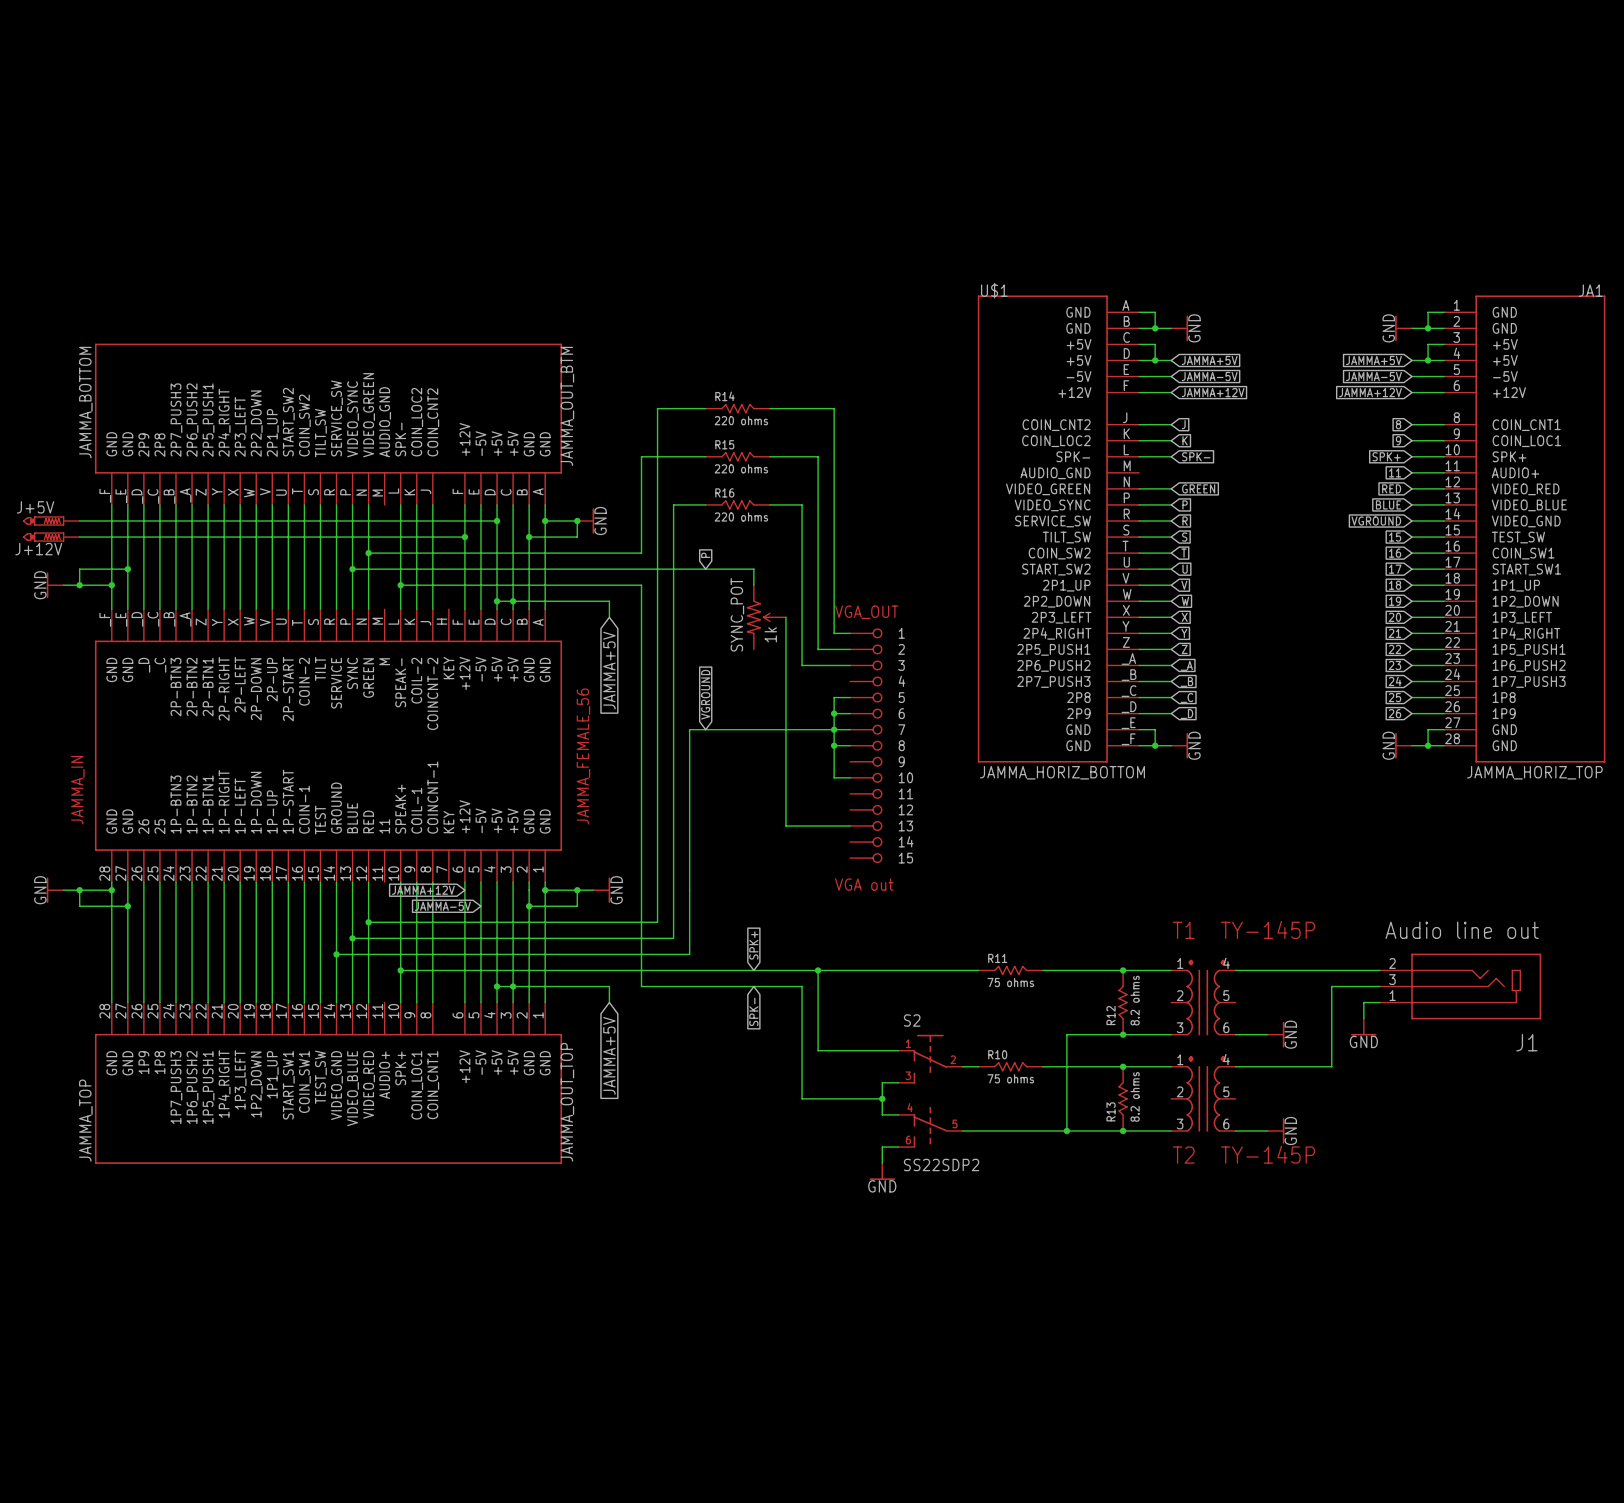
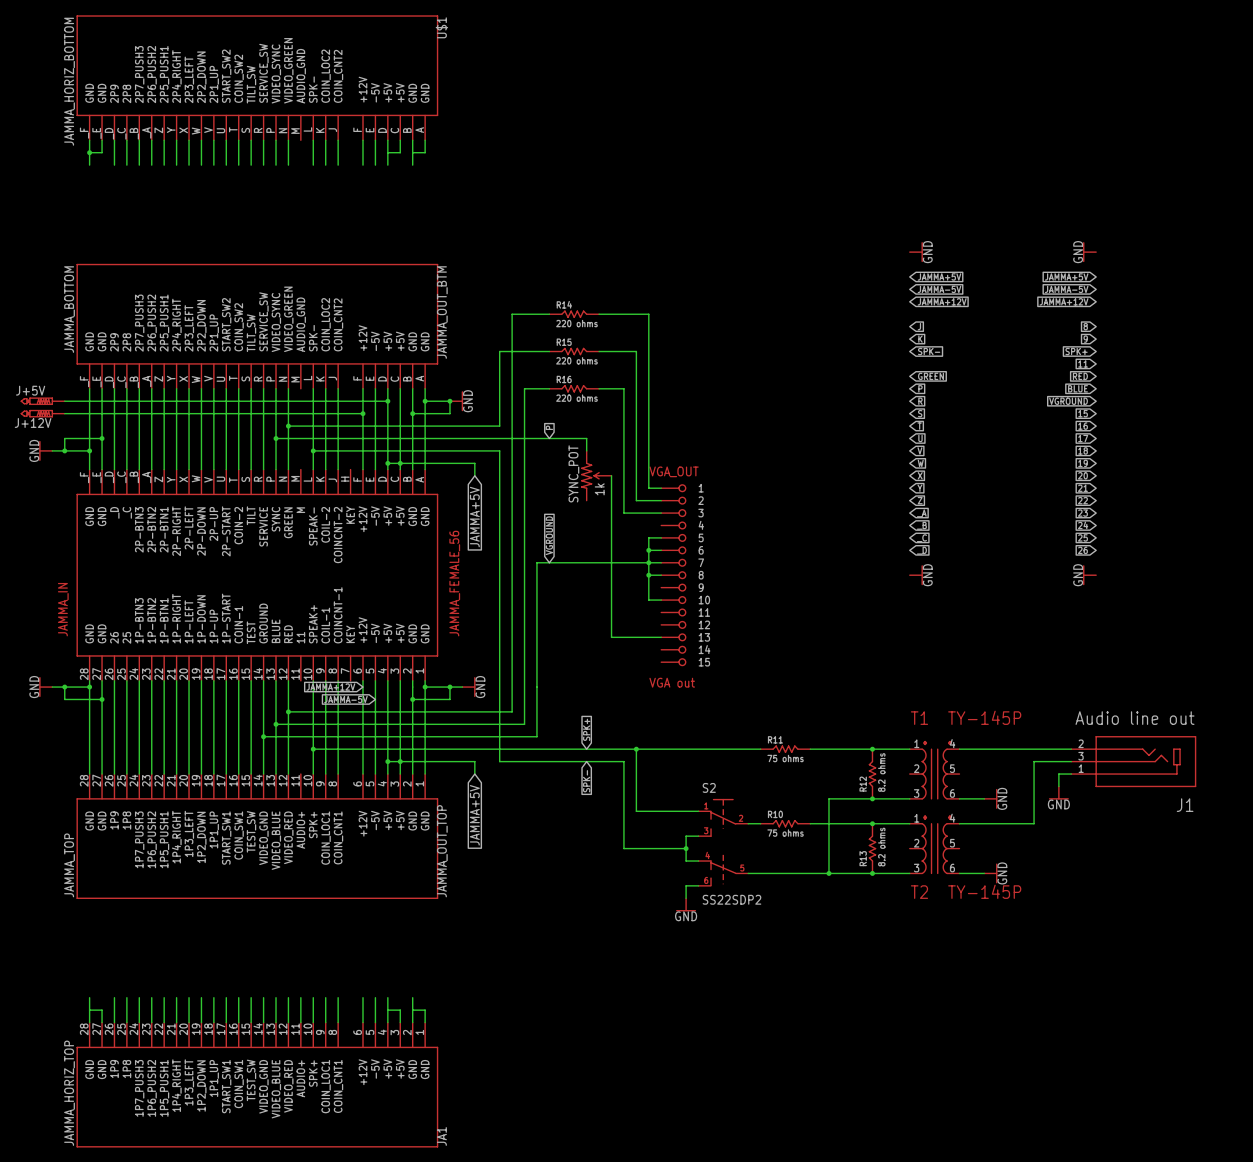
wire: none -> (89, 140) (89, 165)
wire: none -> (102, 140) (102, 152) (89, 152)
wire: none -> (114, 140) (114, 165)
wire: none -> (126, 140) (126, 165)
wire: none -> (139, 140) (139, 165)
wire: none -> (151, 140) (151, 165)
wire: none -> (164, 140) (164, 165)
wire: none -> (176, 140) (176, 165)
wire: none -> (189, 140) (189, 165)
wire: none -> (201, 140) (201, 165)
wire: none -> (213, 140) (213, 165)
wire: none -> (226, 140) (226, 165)
wire: none -> (238, 140) (238, 165)
wire: none -> (251, 140) (251, 165)
wire: none -> (263, 140) (263, 165)
wire: none -> (276, 140) (276, 165)
wire: none -> (288, 140) (288, 165)
wire: none -> (313, 140) (313, 165)
wire: none -> (325, 140) (325, 165)
wire: none -> (338, 140) (338, 165)
wire: none -> (362, 140) (362, 165)
wire: none -> (375, 140) (375, 165)
wire: none -> (387, 140) (387, 165)
wire: none -> (400, 140) (400, 152) (387, 152)
wire: none -> (412, 140) (412, 165)
wire: none -> (425, 140) (425, 152) (412, 152)
junction: none -> (89, 152)
wire: (1139, 312) (1155, 312) (1155, 328) -> none
wire: (1444, 312) (1428, 312) (1428, 328) -> none
wire: (1139, 328) (1171, 328) -> none
junction: (1155, 328) -> none
wire: (1412, 328) (1444, 328) -> none
junction: (1428, 328) -> none
wire: (1139, 344) (1155, 344) (1155, 360) -> none
wire: (1444, 344) (1428, 344) (1428, 360) -> none
wire: (1139, 360) (1171, 360) -> none
junction: (1155, 360) -> none
wire: (1412, 360) (1444, 360) -> none
junction: (1428, 360) -> none
wire: (1139, 376) (1171, 376) -> none
wire: (1412, 376) (1444, 376) -> none
wire: (1139, 392) (1171, 392) -> none
wire: (1412, 392) (1444, 392) -> none
wire: (1139, 424) (1171, 424) -> none
wire: (1412, 424) (1444, 424) -> none
wire: (1139, 440) (1171, 440) -> none
wire: (1412, 440) (1444, 440) -> none
wire: (1139, 456) (1171, 456) -> none
wire: (1412, 456) (1444, 456) -> none
wire: (1412, 472) (1444, 472) -> none
wire: (1139, 488) (1171, 488) -> none
wire: (1412, 488) (1444, 488) -> none
wire: (1139, 504) (1171, 504) -> none
wire: (1412, 504) (1444, 504) -> none
wire: (1139, 521) (1171, 521) -> none
wire: (1412, 521) (1444, 521) -> none
U$1 rotation: 0° (1042, 529) -> 90° clockwise (257, 65)
U$1 position: (1058, 529) -> (257, 77)
JA1 position: (1524, 529) -> (257, 1085)
JA1 rotation: 0° (1540, 529) -> 90° clockwise (257, 1097)
wire: (1139, 537) (1171, 537) -> none
wire: (1412, 537) (1444, 537) -> none
wire: (1139, 553) (1171, 553) -> none
wire: (1412, 553) (1444, 553) -> none
wire: (1139, 569) (1171, 569) -> none
wire: (1412, 569) (1444, 569) -> none
wire: (1139, 585) (1171, 585) -> none
wire: (1412, 585) (1444, 585) -> none
wire: (1139, 601) (1171, 601) -> none
wire: (1412, 601) (1444, 601) -> none
wire: (1139, 617) (1171, 617) -> none
wire: (1412, 617) (1444, 617) -> none
wire: (1139, 633) (1171, 633) -> none
wire: (1412, 633) (1444, 633) -> none
wire: (1139, 649) (1171, 649) -> none
wire: (1412, 649) (1444, 649) -> none
wire: (1139, 665) (1171, 665) -> none
wire: (1412, 665) (1444, 665) -> none
wire: (1139, 681) (1171, 681) -> none
wire: (1412, 681) (1444, 681) -> none
wire: (1139, 697) (1171, 697) -> none
wire: (1412, 697) (1444, 697) -> none
wire: (1139, 713) (1171, 713) -> none
wire: (1412, 713) (1444, 713) -> none
wire: (1139, 729) (1155, 729) (1155, 745) -> none
wire: (1444, 729) (1428, 729) (1428, 745) -> none
wire: (1139, 745) (1171, 745) -> none
junction: (1155, 745) -> none
wire: (1412, 745) (1444, 745) -> none
junction: (1428, 745) -> none
wire: none -> (89, 997) (89, 1022)
wire: none -> (114, 997) (114, 1022)
wire: none -> (126, 997) (126, 1022)
wire: none -> (139, 997) (139, 1022)
wire: none -> (151, 997) (151, 1022)
wire: none -> (164, 997) (164, 1022)
wire: none -> (176, 997) (176, 1022)
wire: none -> (189, 997) (189, 1022)
wire: none -> (201, 997) (201, 1022)
wire: none -> (213, 997) (213, 1022)
wire: none -> (226, 997) (226, 1022)
wire: none -> (238, 997) (238, 1022)
wire: none -> (251, 997) (251, 1022)
wire: none -> (263, 997) (263, 1022)
wire: none -> (276, 997) (276, 1022)
wire: none -> (288, 997) (288, 1022)
wire: none -> (300, 997) (300, 1022)
wire: none -> (313, 997) (313, 1022)
wire: none -> (325, 997) (325, 1022)
wire: none -> (338, 997) (338, 1022)
wire: none -> (362, 997) (362, 1022)
wire: none -> (375, 997) (375, 1022)
wire: none -> (387, 997) (387, 1022)
wire: none -> (412, 997) (412, 1022)
wire: none -> (89, 1010) (102, 1010) (102, 1022)
wire: none -> (387, 1010) (400, 1010) (400, 1022)
wire: none -> (412, 1010) (425, 1010) (425, 1022)

